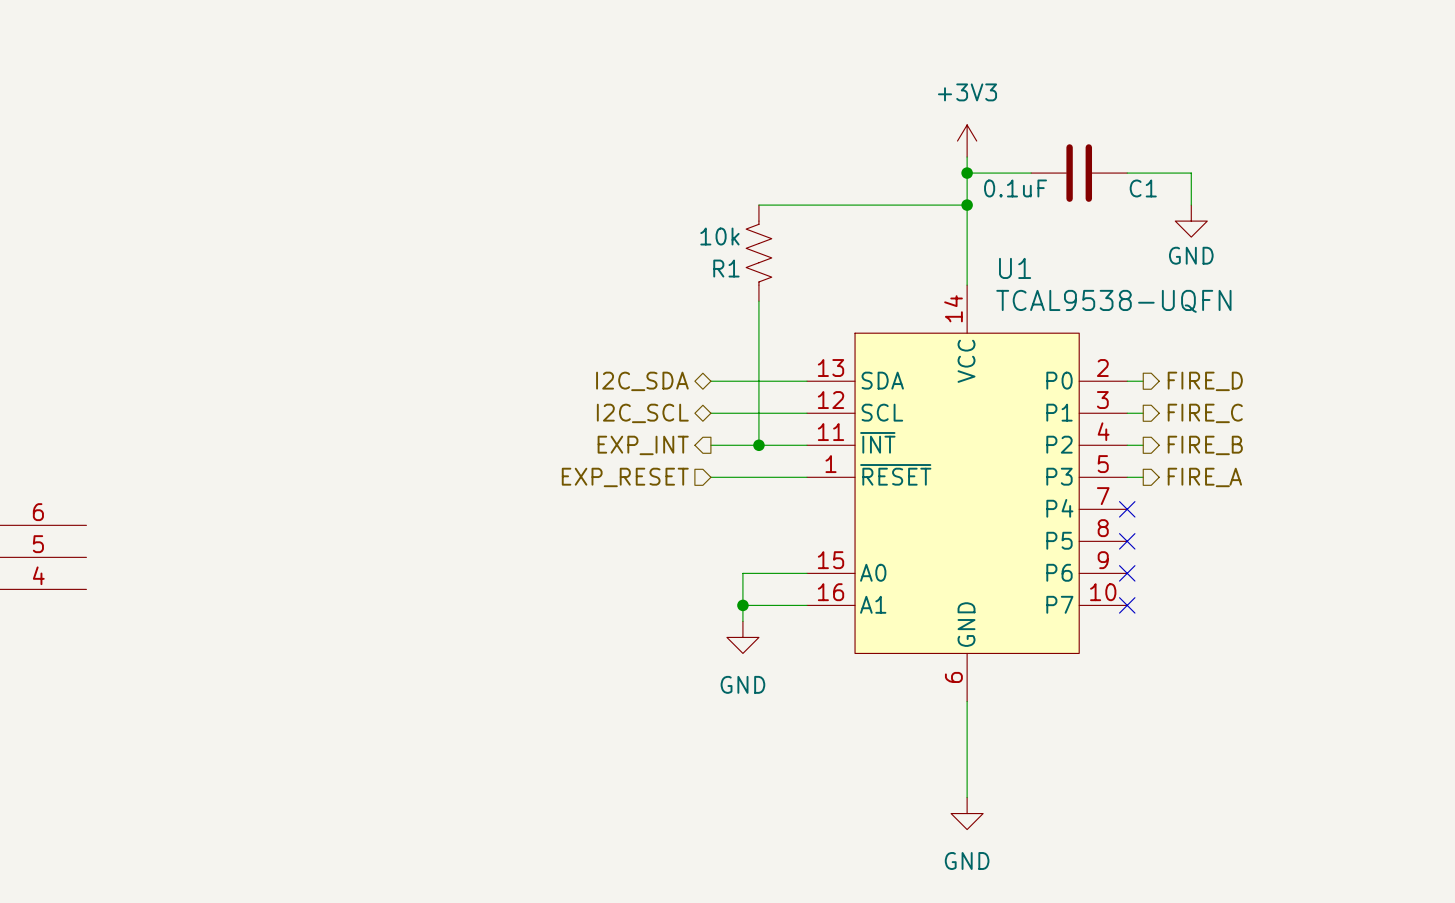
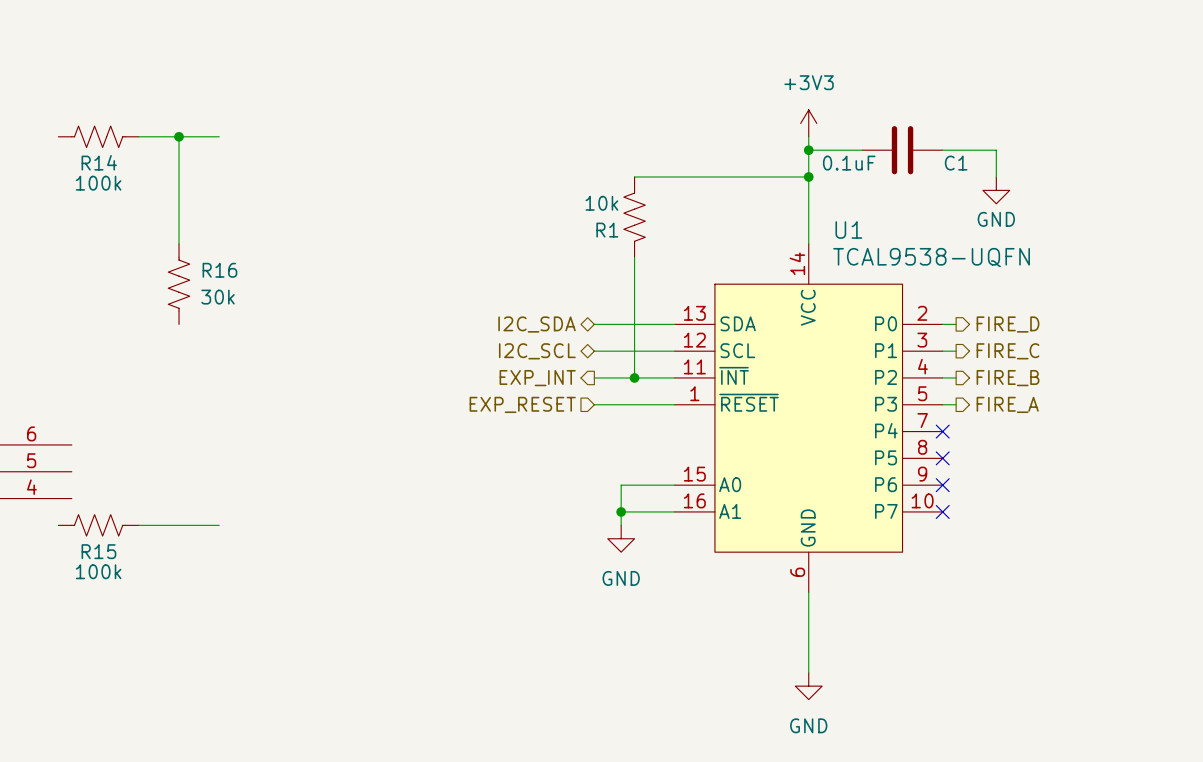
R14: none -> 100k (98, 136)
wire: none -> (138, 136) (219, 136)
wire: none -> (179, 136) (179, 243)
junction: none -> (179, 136)
R16: none -> 30k (179, 284)
R15: none -> 100k (98, 525)
wire: none -> (138, 525) (219, 525)

